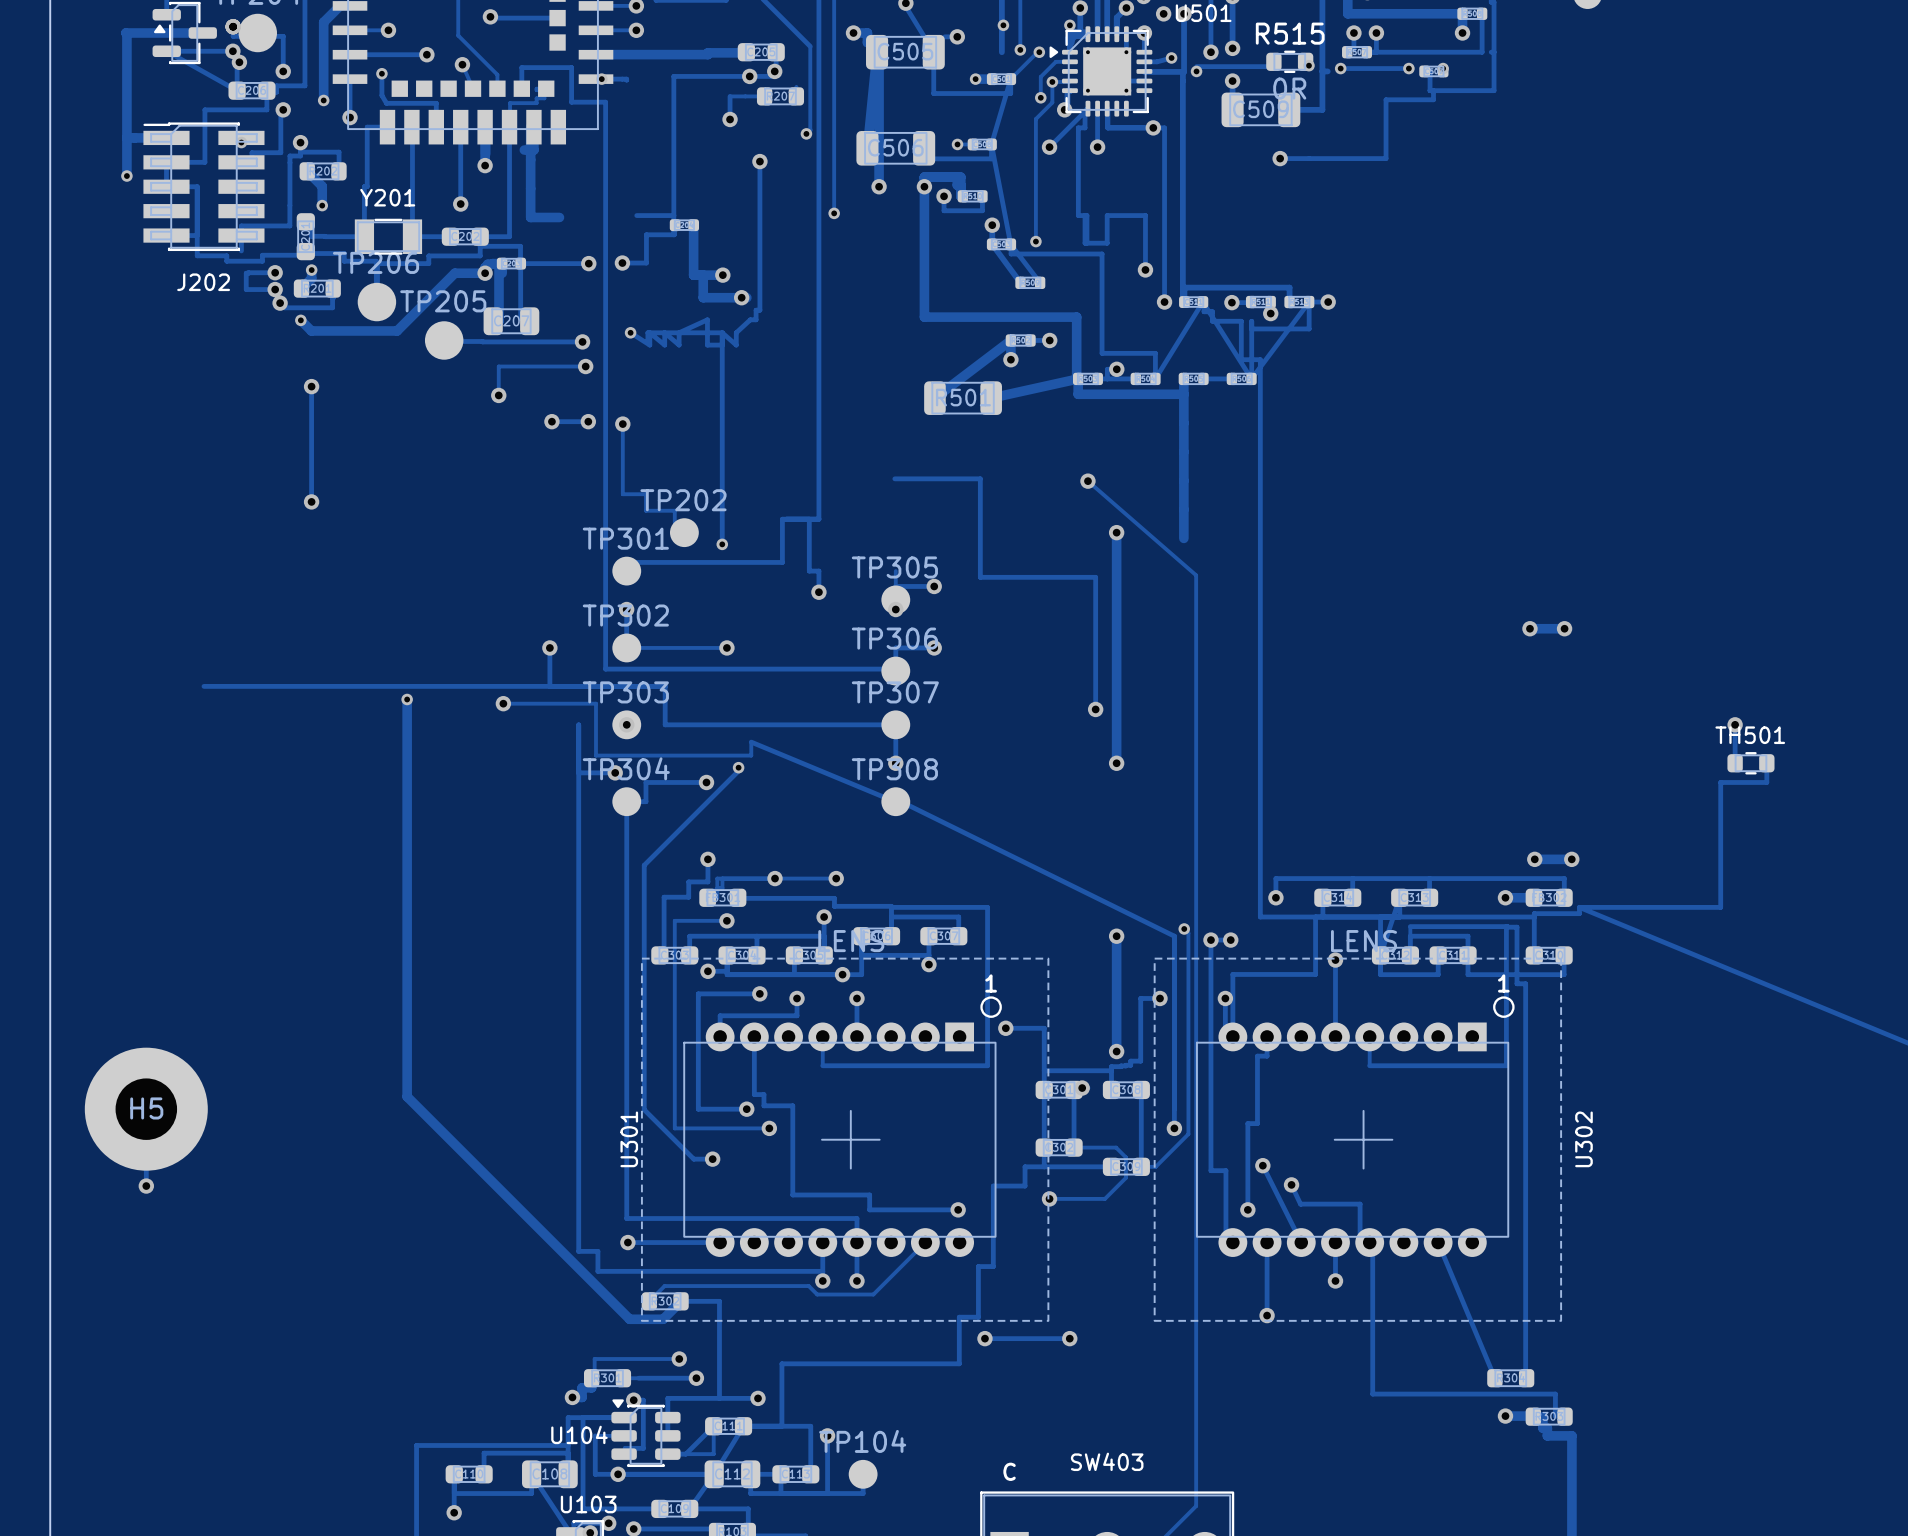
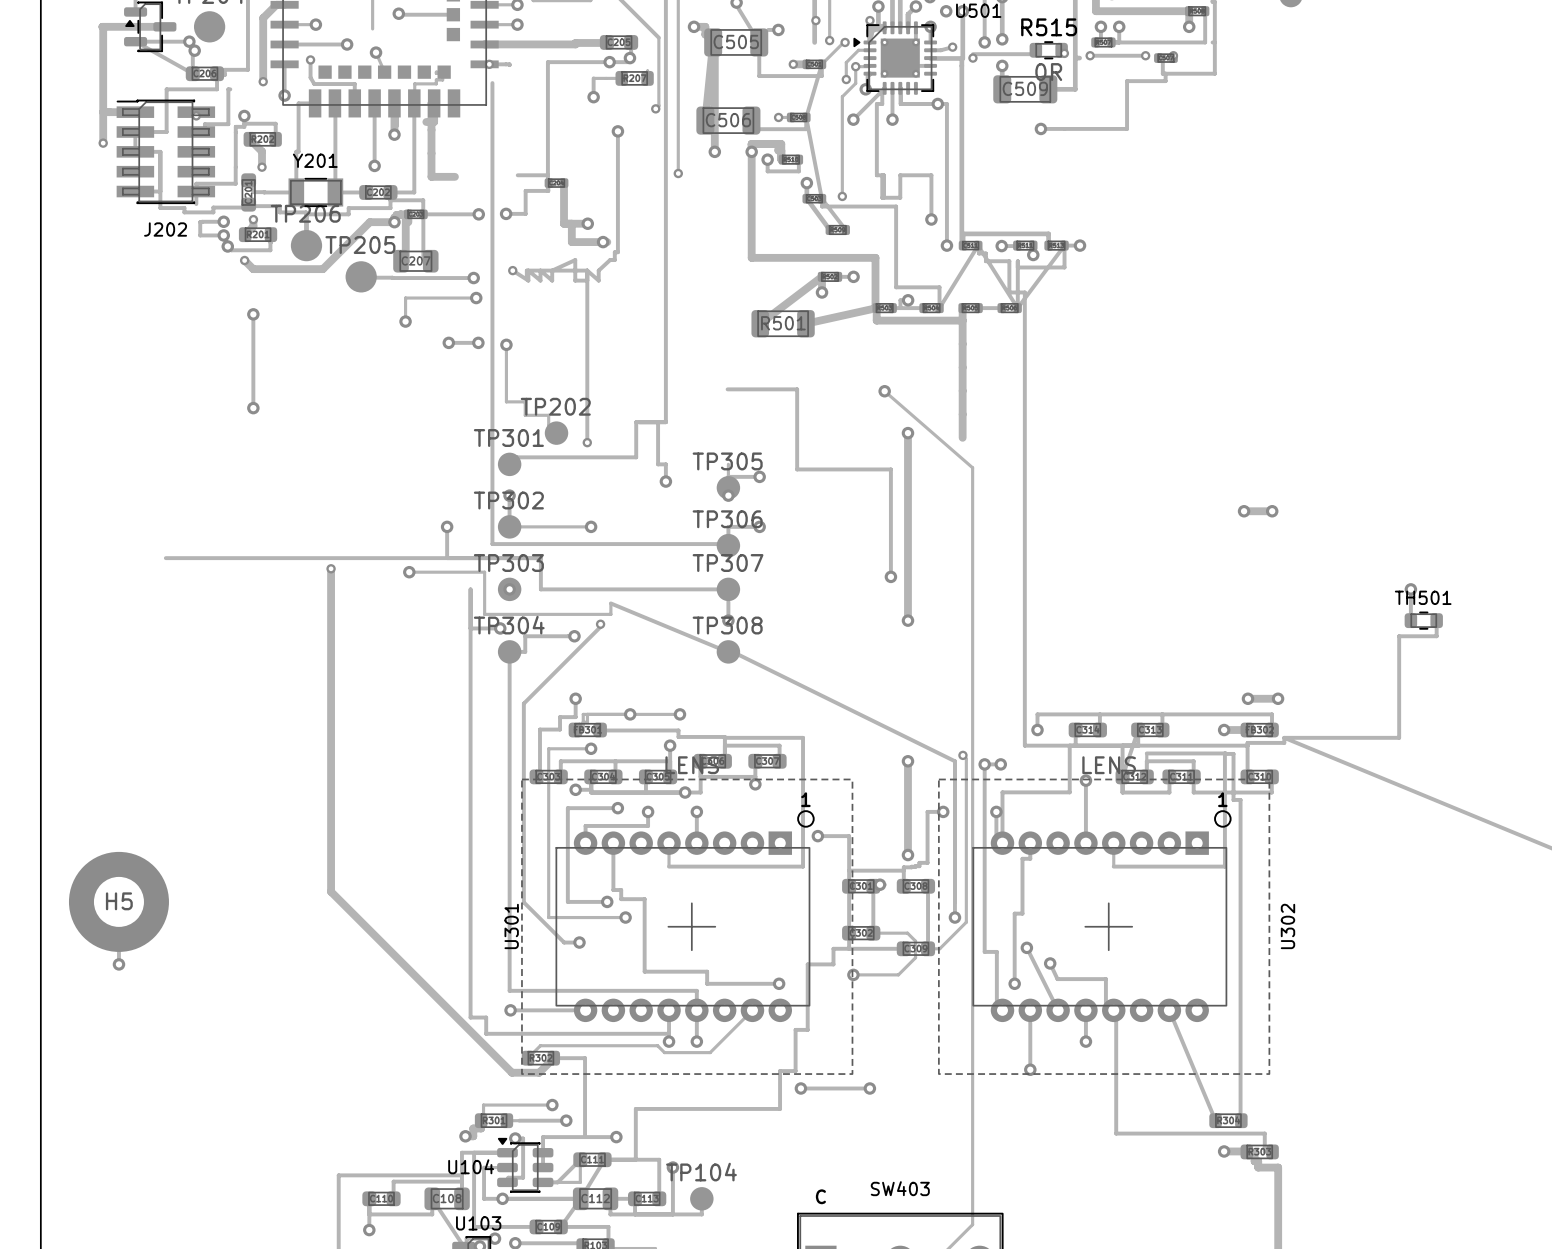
track: (233, 26) (233, 36) (283, 36) (283, 71) -> none
via: (233, 26) -> none
track: (458, 35) (497, 74) (497, 88) -> none
via: (283, 71) -> none
track: (521, 88) (521, 67) (571, 67) (571, 102) (605, 102) -> none
via: (283, 109) -> none

